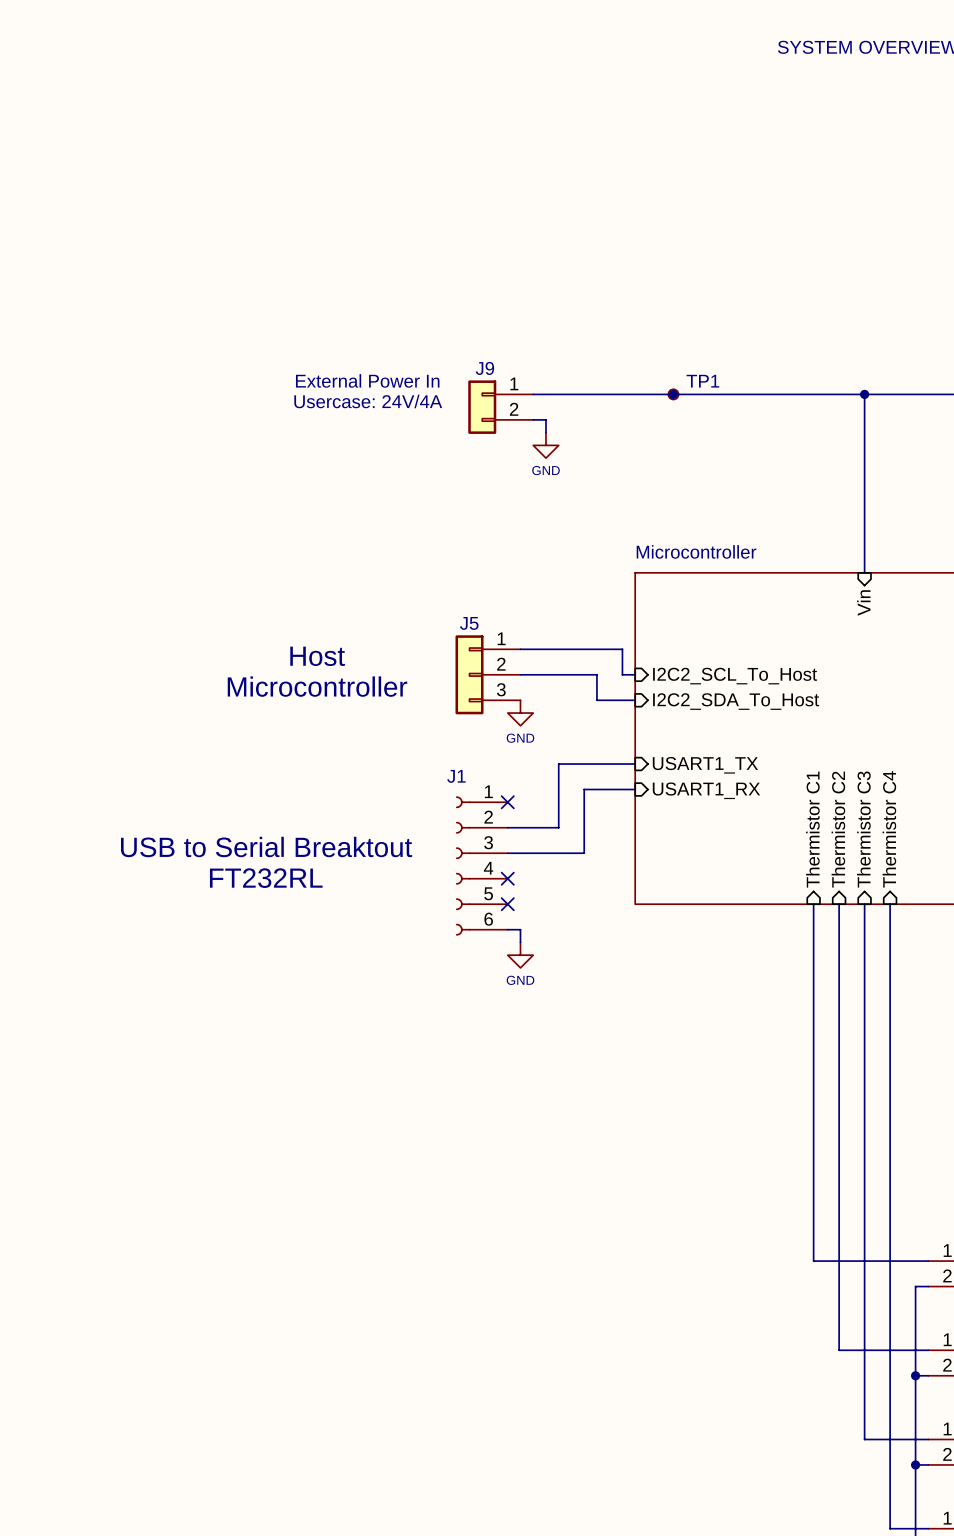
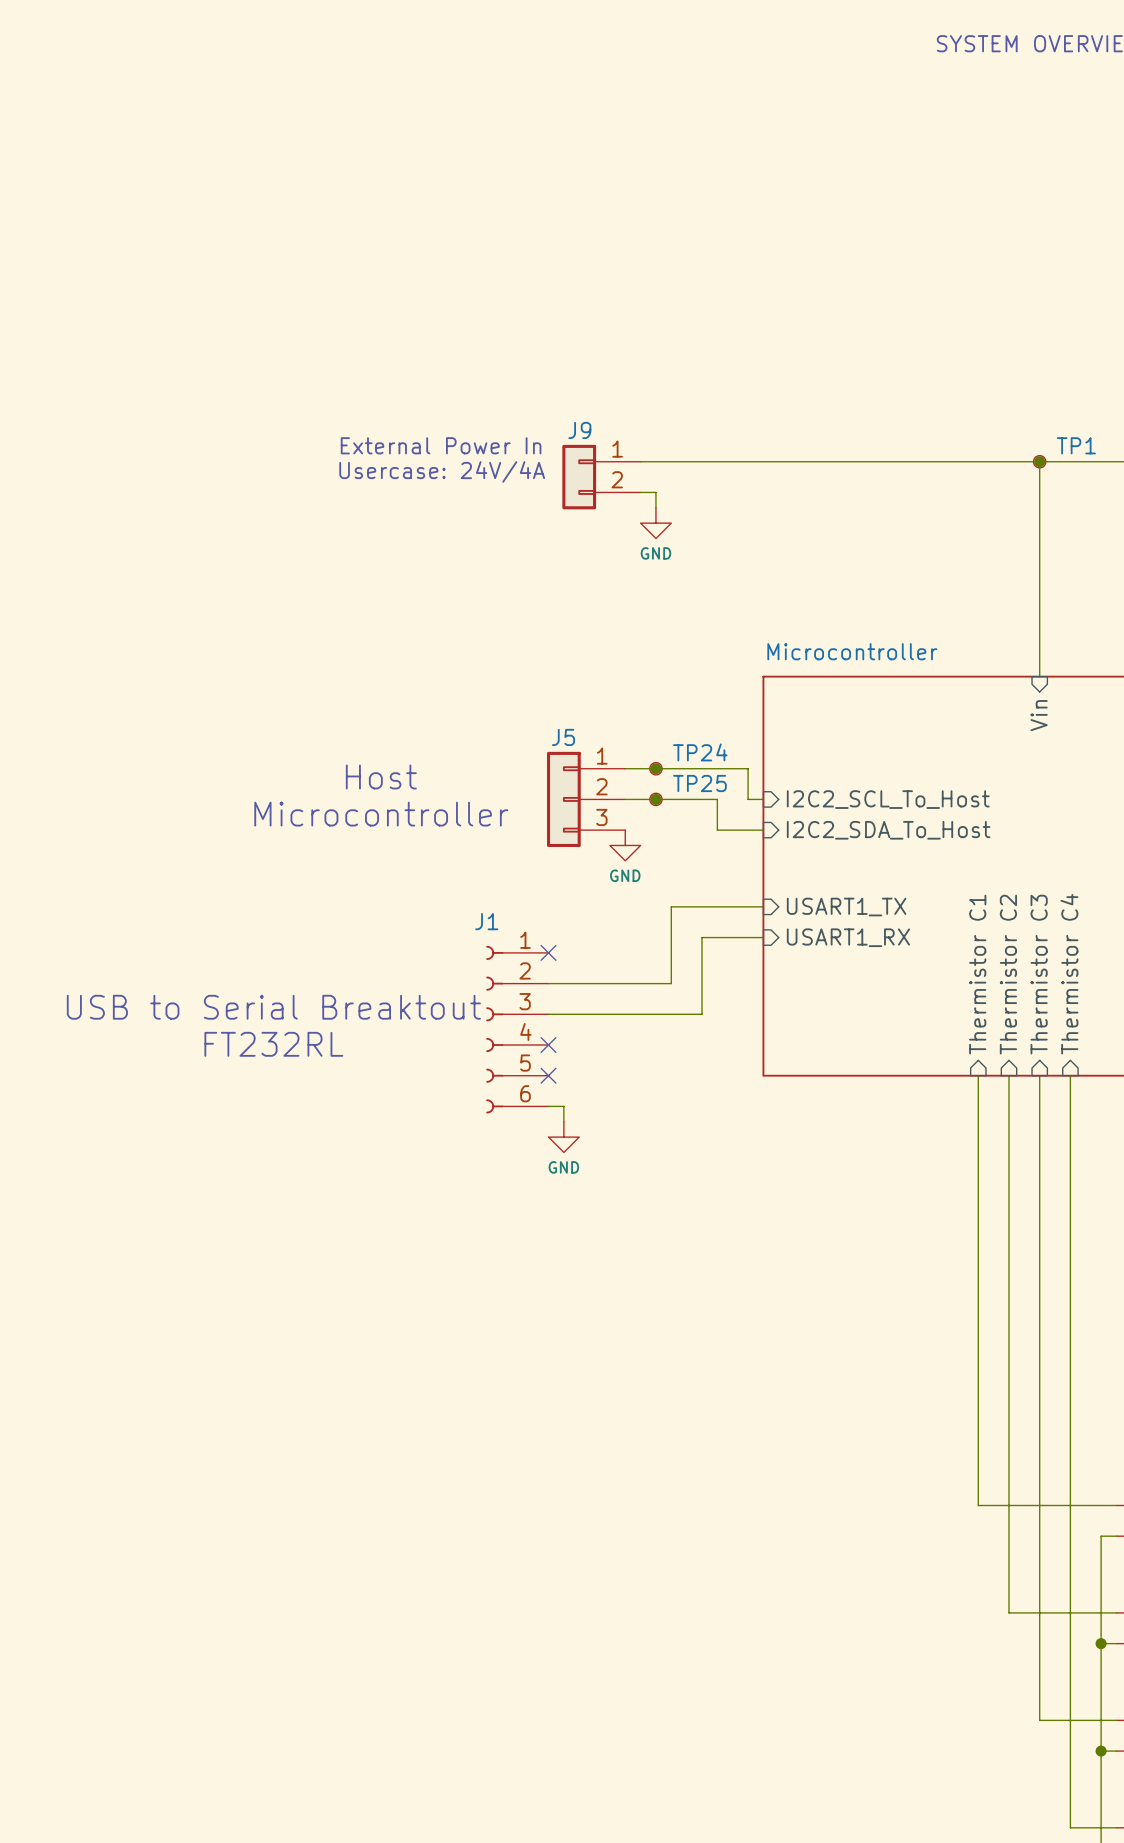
junction: (673, 394) -> none
TP1 position: (673, 394) -> (1039, 461)
junction: none -> (655, 768)
TP24: none -> (655, 768)
junction: none -> (655, 799)
TP25: none -> (655, 799)
no-connect mark: none -> (548, 952)
no-connect mark: (507, 802) -> none
text position: USB to Serial Breaktout (266, 846) -> USB to Serial Breaktout (273, 1007)
J1 position: (481, 865) -> (517, 1029)
text position: FT232RL (266, 878) -> FT232RL (273, 1044)
no-connect mark: none -> (548, 1045)
no-connect mark: (507, 878) -> none
no-connect mark: none -> (548, 1075)
no-connect mark: (507, 904) -> none
wire: (507, 929) (520, 929) (520, 942) -> (548, 1106) (563, 1106) (563, 1121)
power symbol position: GND (520, 955) -> GND (563, 1137)

